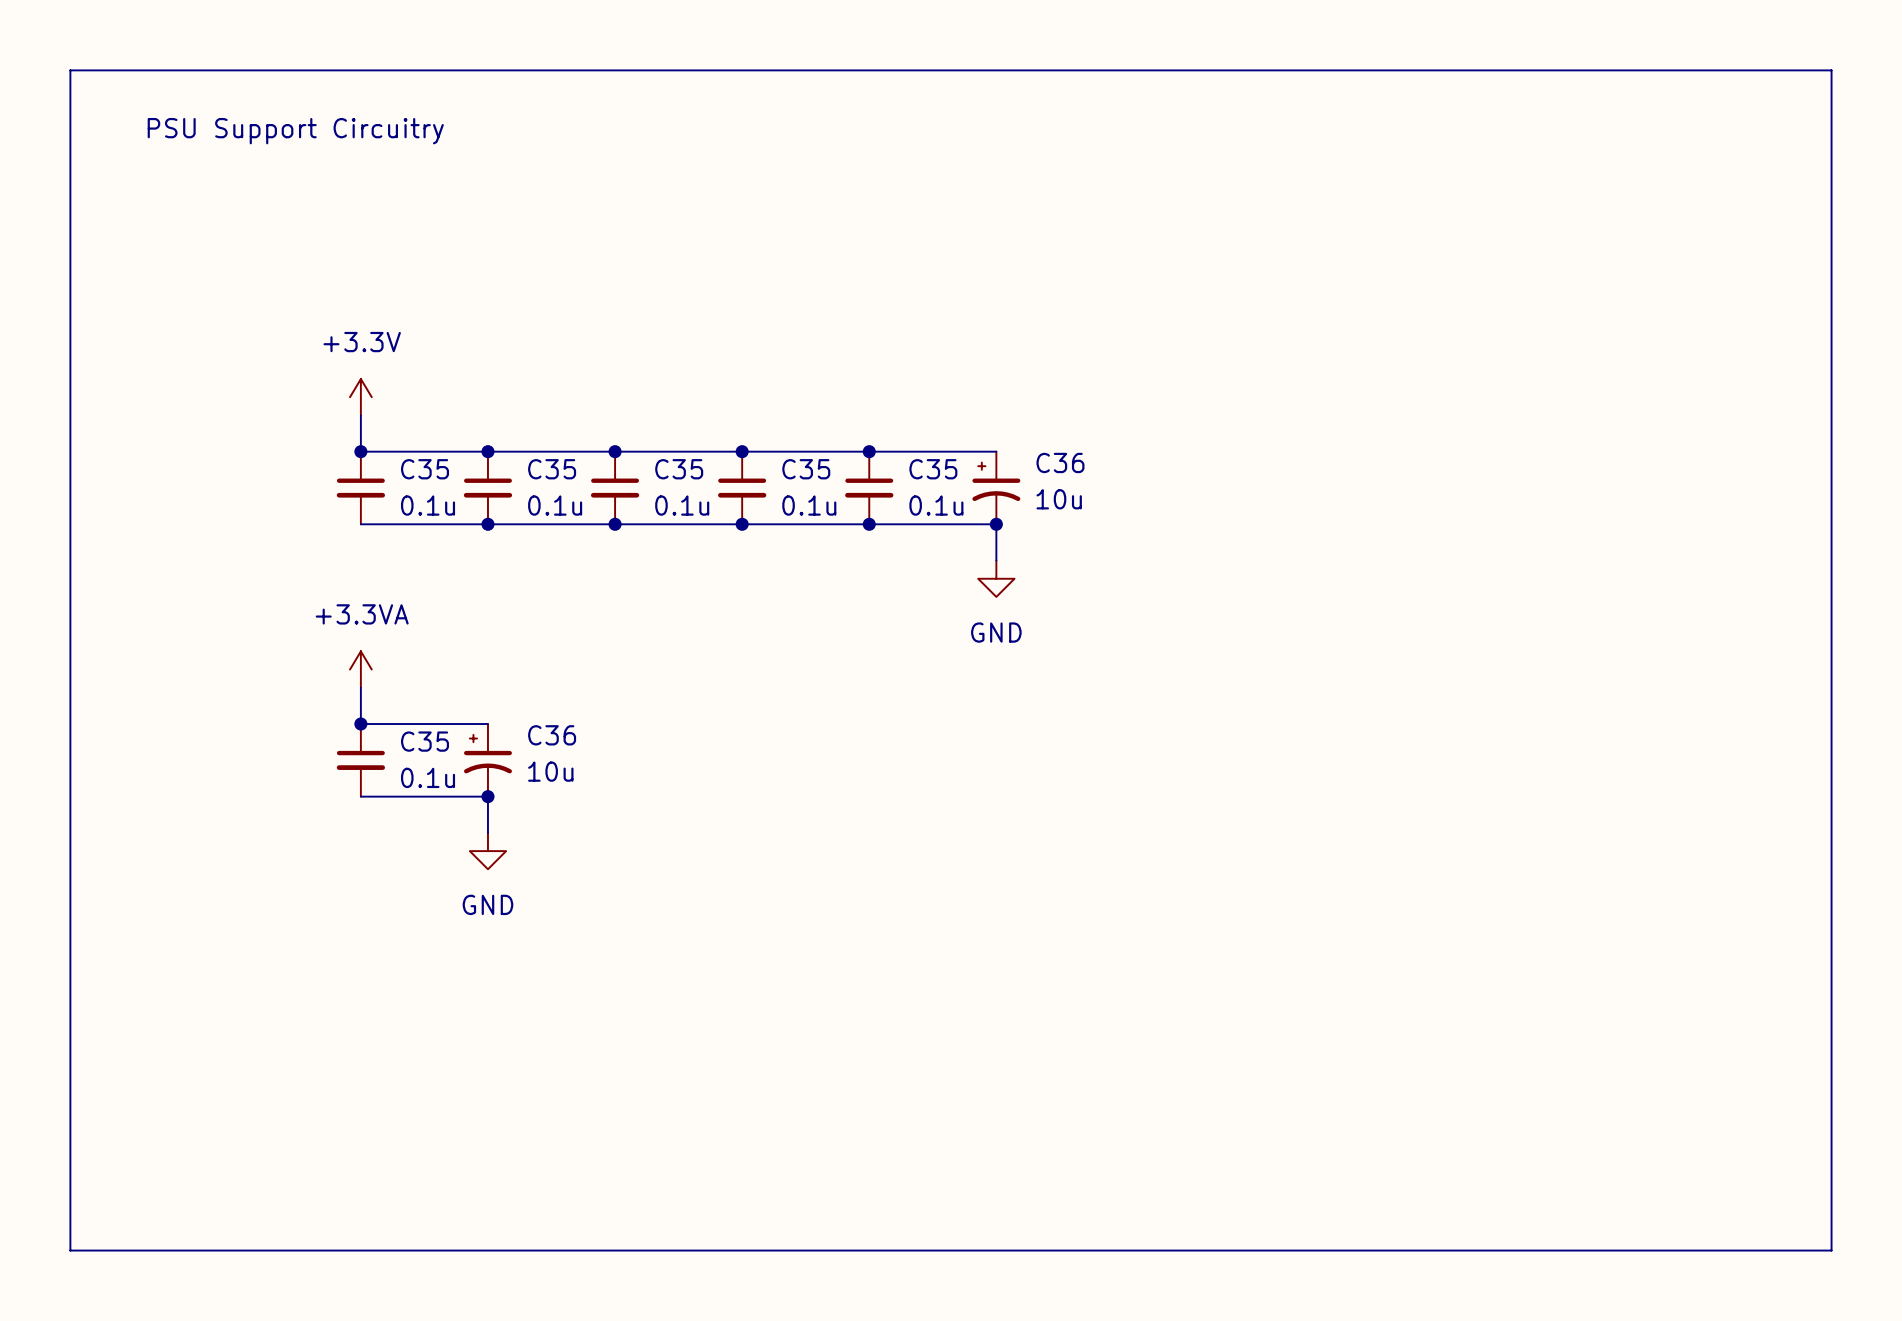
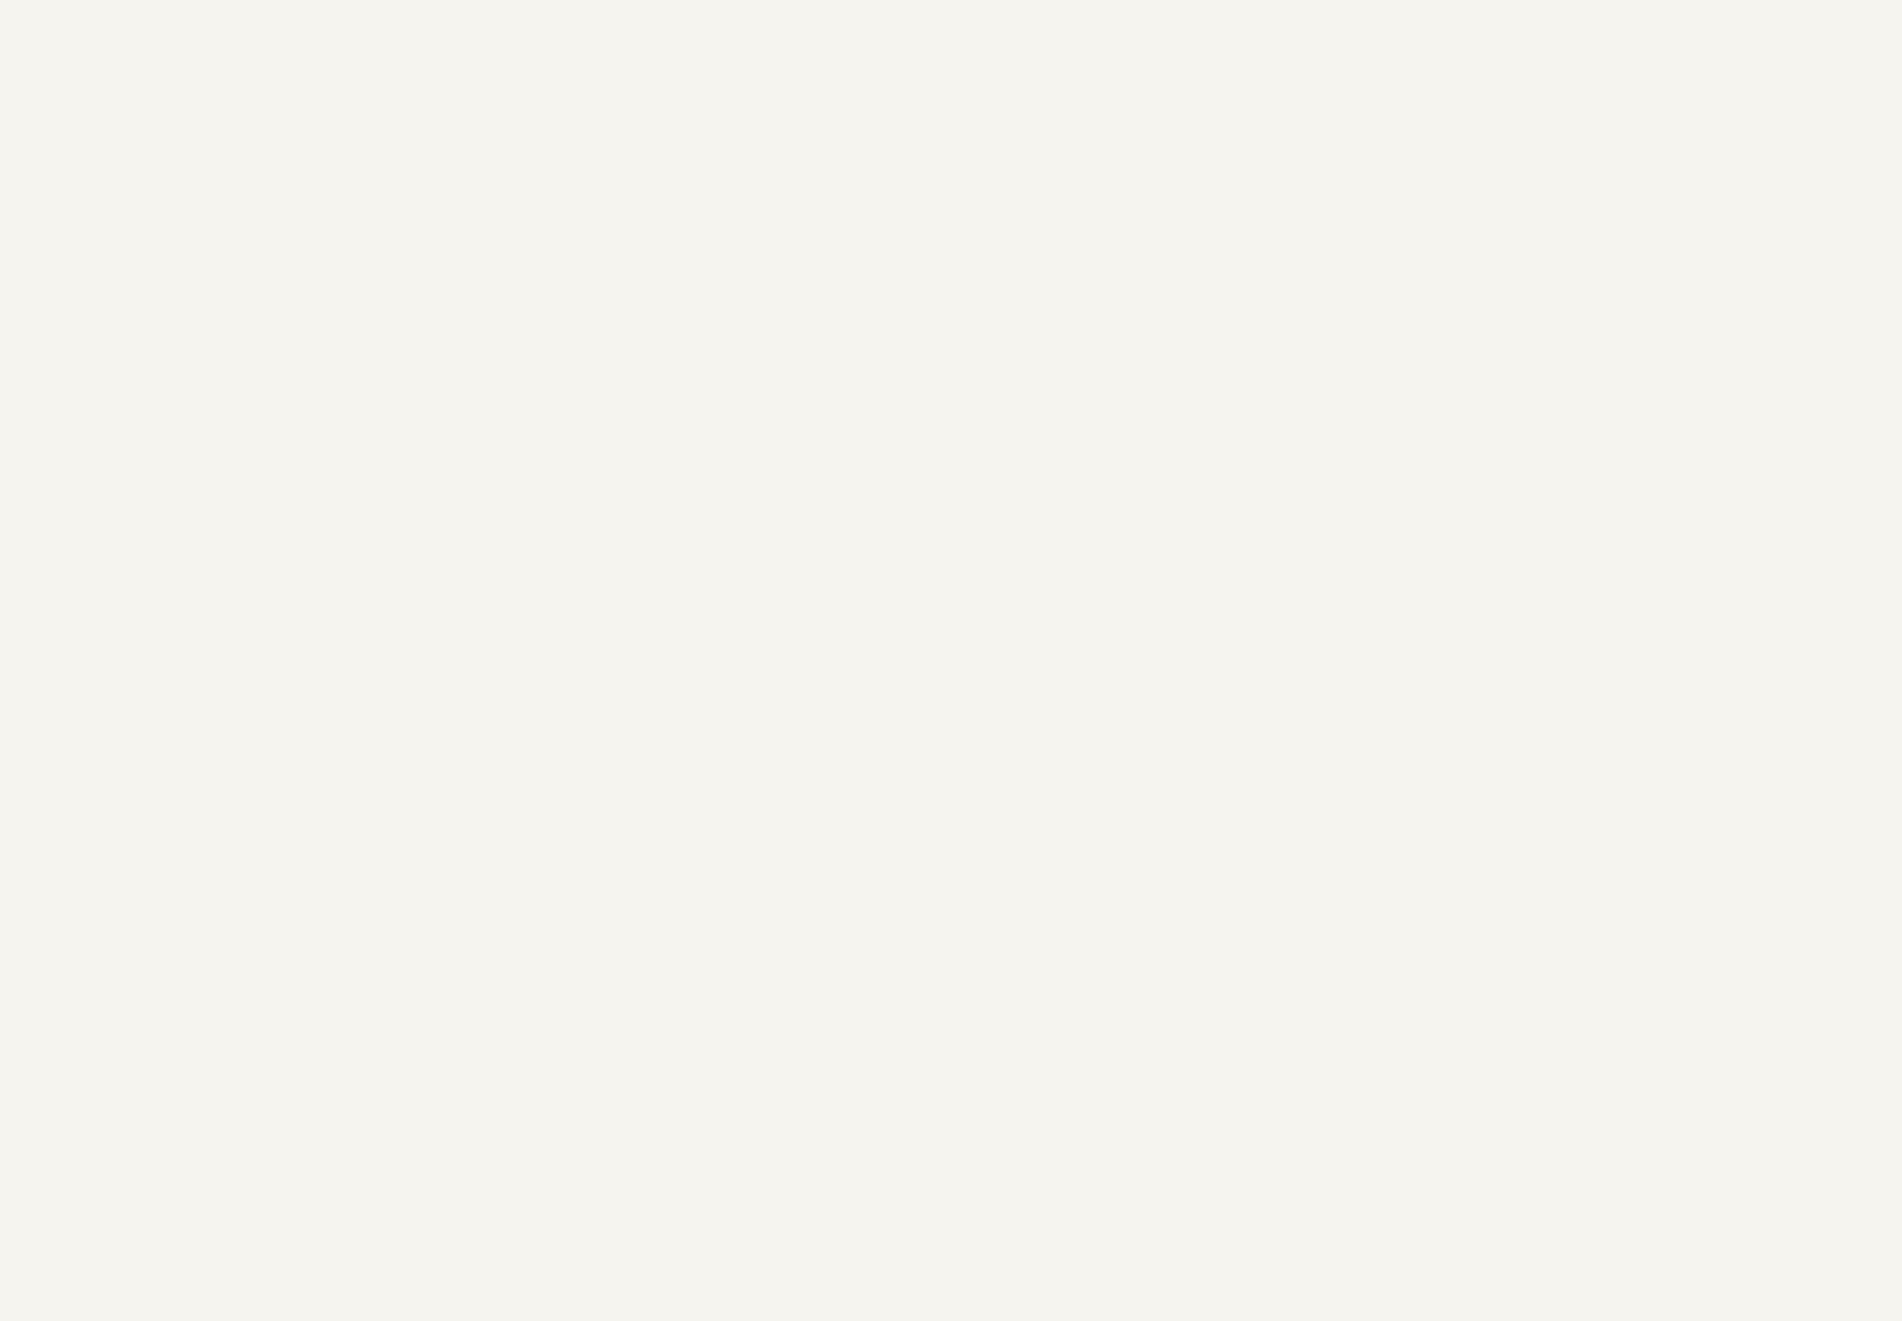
line: (70, 70) (1831, 70) (1831, 1250) (70, 1250) (70, 70) -> none
text: PSU Support Circuitry (295, 131) -> none
power symbol: +3.3V (360, 397) -> none
wire: (360, 415) (360, 451) (996, 451) -> none
junction: (360, 451) -> none
junction: (487, 451) -> none
junction: (615, 451) -> none
junction: (742, 451) -> none
junction: (869, 451) -> none
C35: 0.1u (360, 487) -> none
C35: 0.1u (487, 487) -> none
C35: 0.1u (615, 487) -> none
C35: 0.1u (742, 487) -> none
C35: 0.1u (869, 487) -> none
C36: 10u (996, 487) -> none
wire: (360, 524) (996, 524) (996, 560) -> none
junction: (487, 524) -> none
junction: (615, 524) -> none
junction: (742, 524) -> none
junction: (869, 524) -> none
junction: (996, 524) -> none
power symbol: GND (996, 578) -> none
power symbol: +3.3VA (360, 669) -> none
wire: (360, 687) (360, 724) (487, 724) -> none
junction: (360, 724) -> none
C35: 0.1u (360, 760) -> none
C36: 10u (487, 760) -> none
wire: (360, 796) (487, 796) (487, 832) -> none
junction: (487, 796) -> none
power symbol: GND (487, 851) -> none

